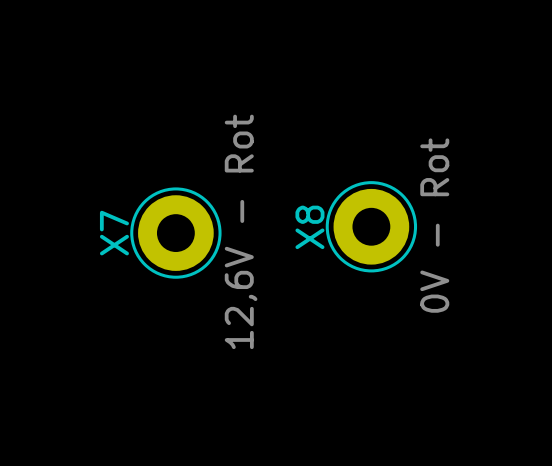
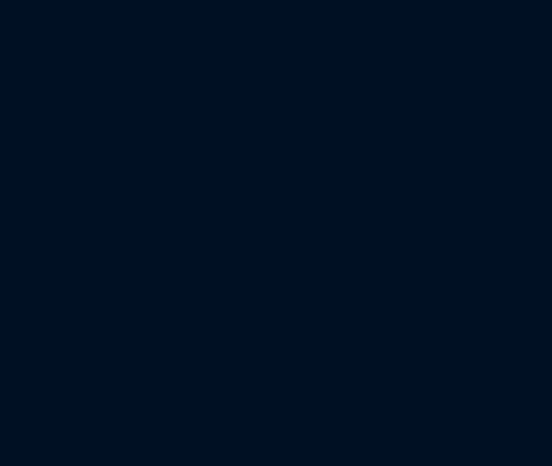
X8: 0V - Rot (371, 226) -> none
X7: 12,6V - Rot (175, 233) -> none

